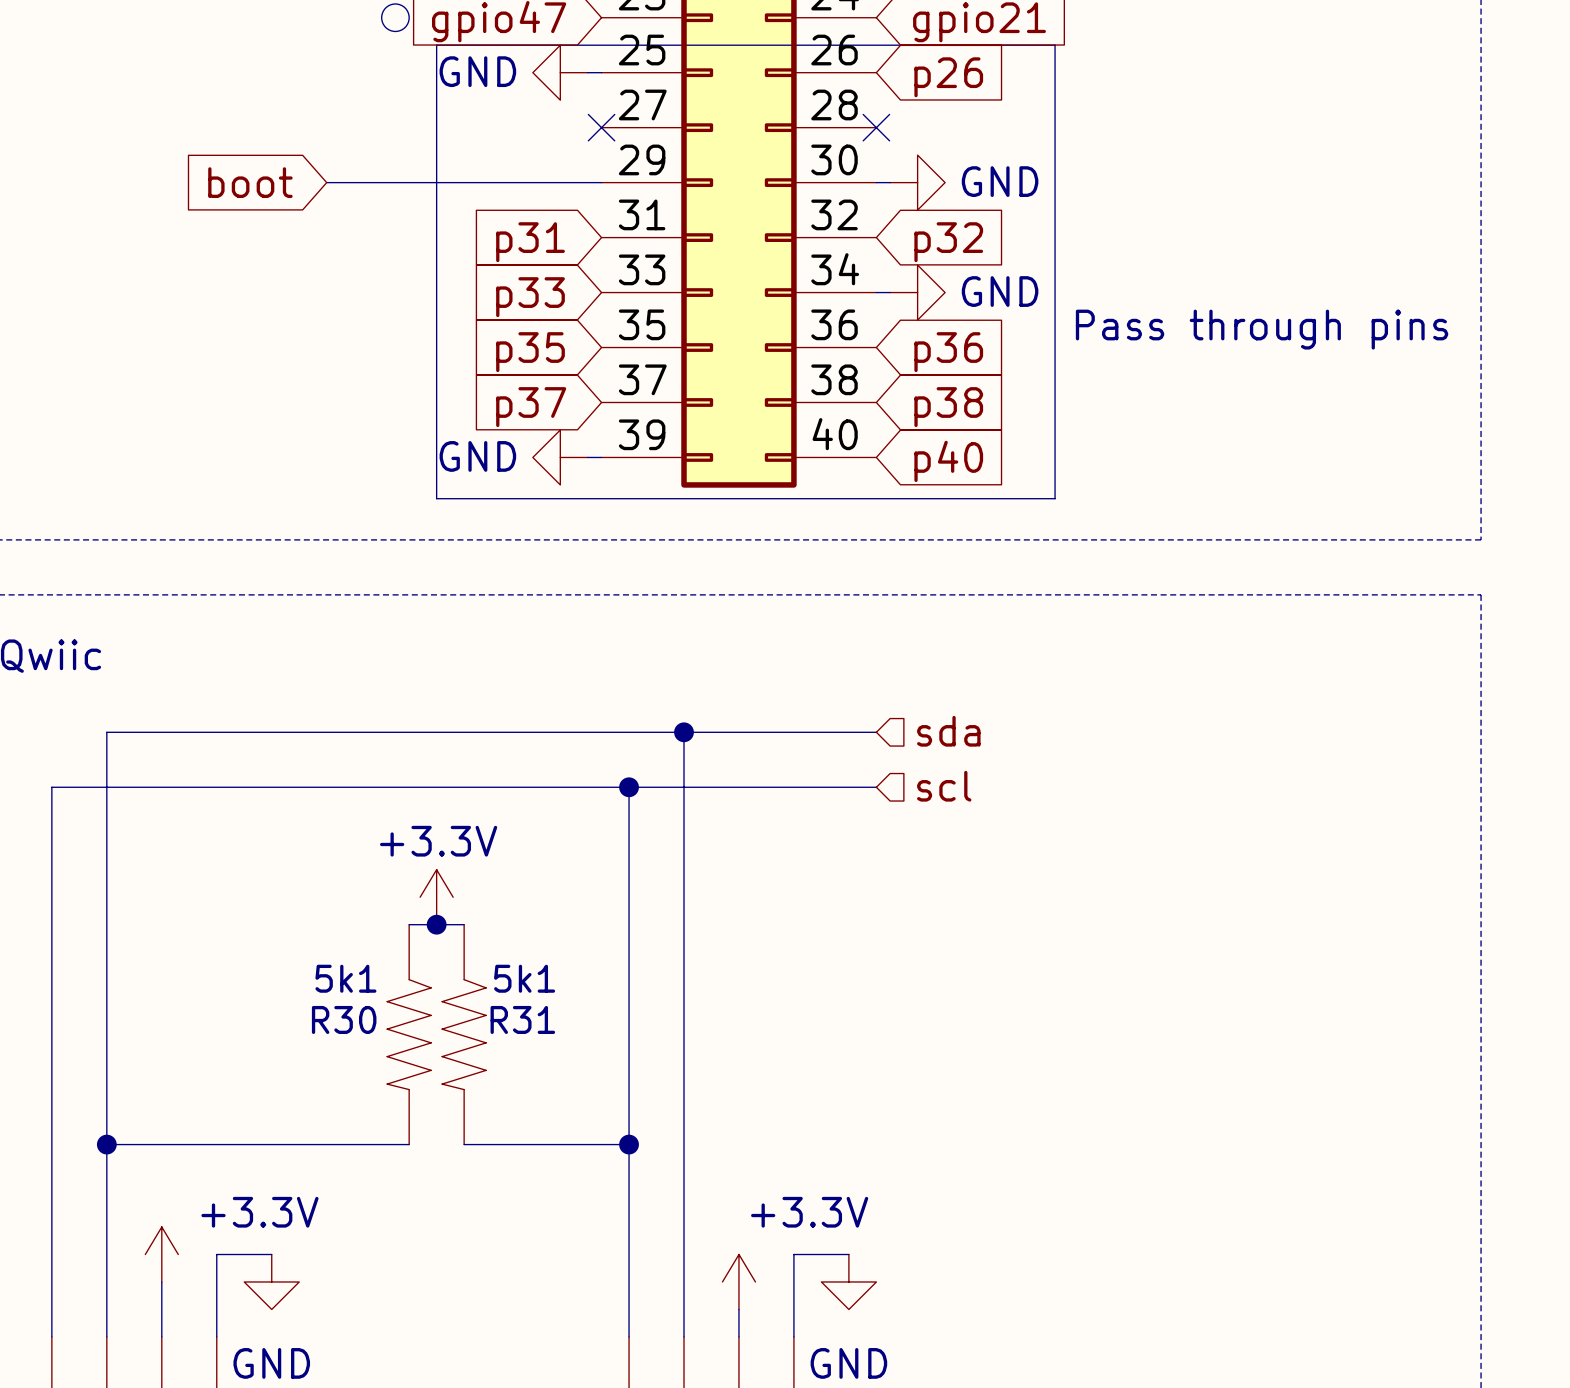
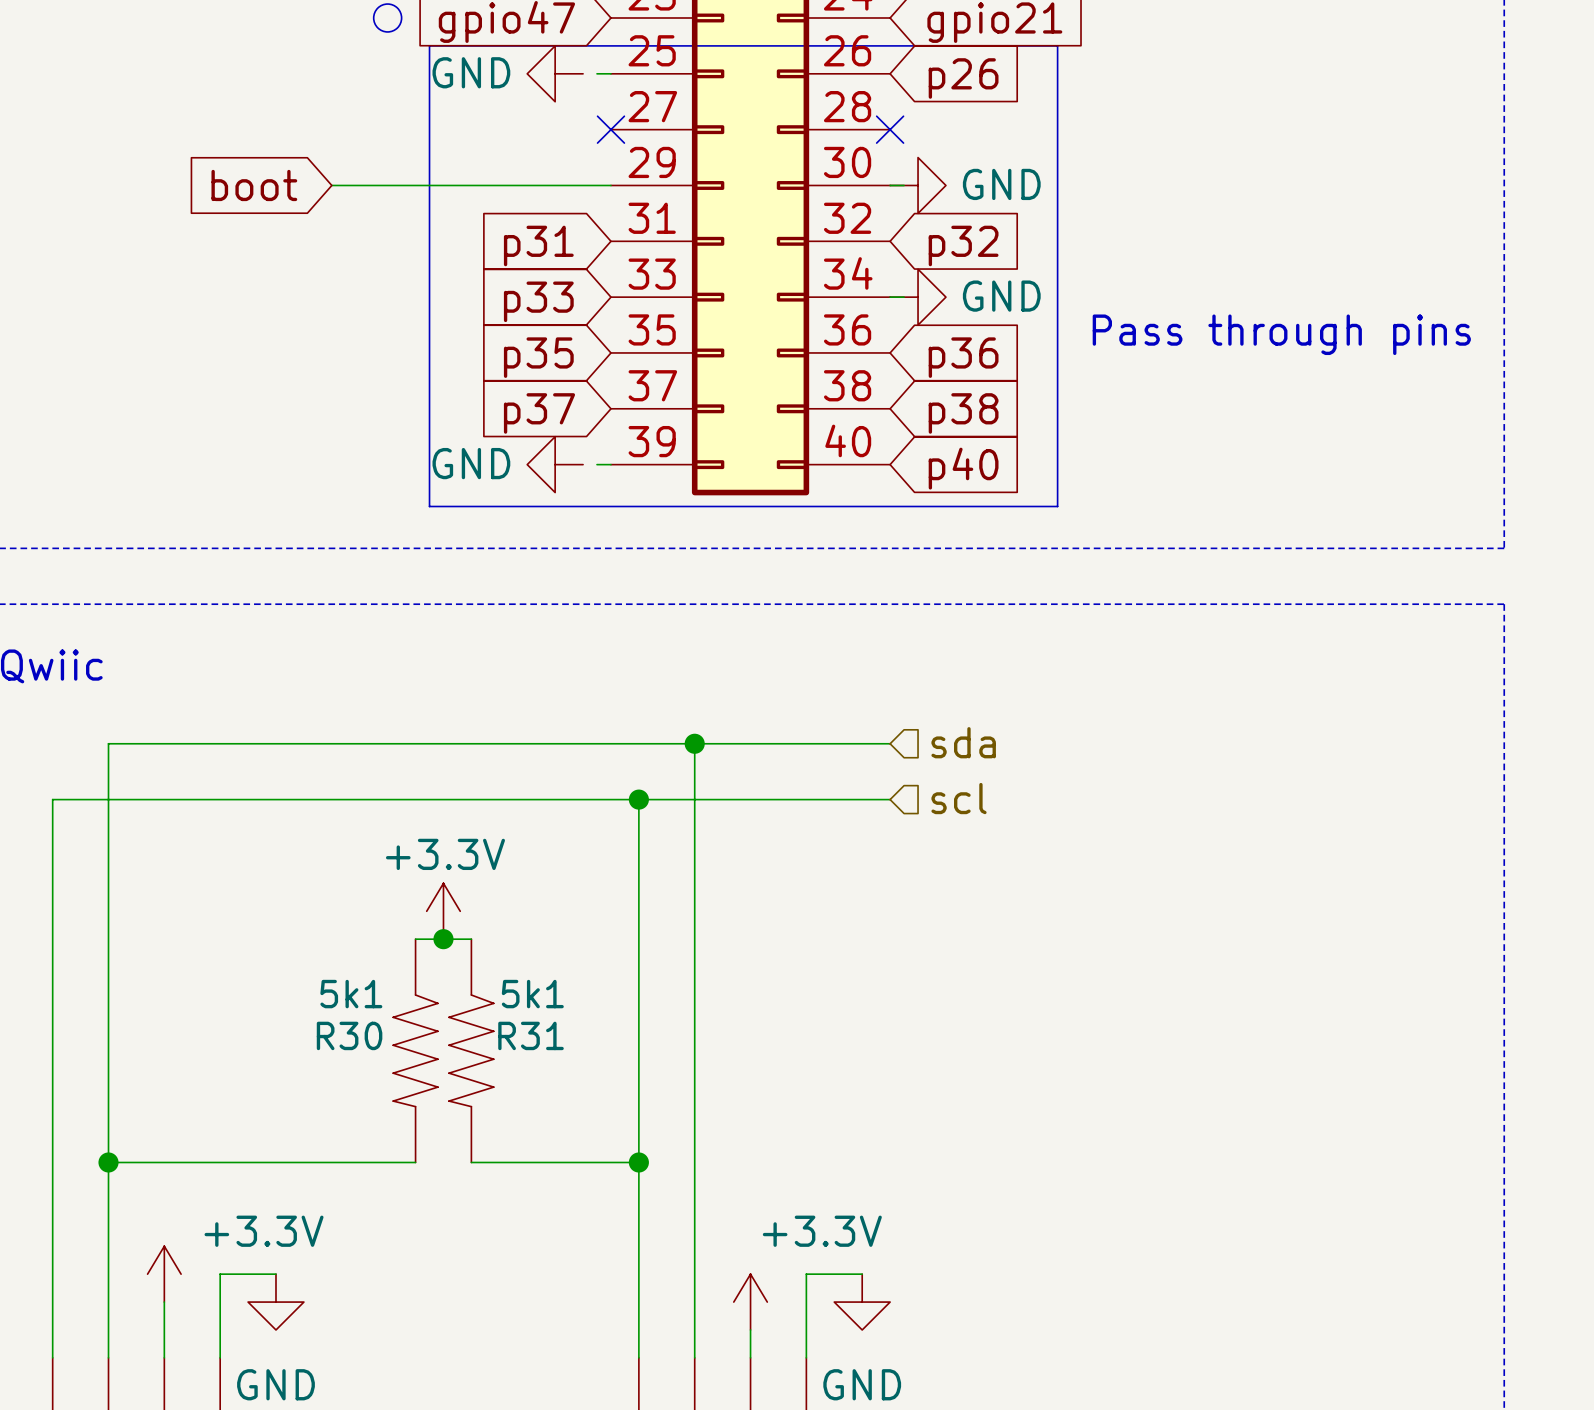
drawing position: (395, 17) -> (387, 17)
line: (436, 45) (436, 498) -> (443, 45) (429, 45) (429, 506) (443, 506)
line: (1041, 45) (1055, 45) (1055, 498) (1041, 498) -> (1057, 45) (1057, 506)
power symbol position: GND (560, 72) -> GND (555, 73)
power symbol position: GND (917, 182) -> GND (918, 185)
power symbol position: GND (917, 292) -> GND (918, 297)
power symbol position: GND (560, 457) -> GND (555, 464)

